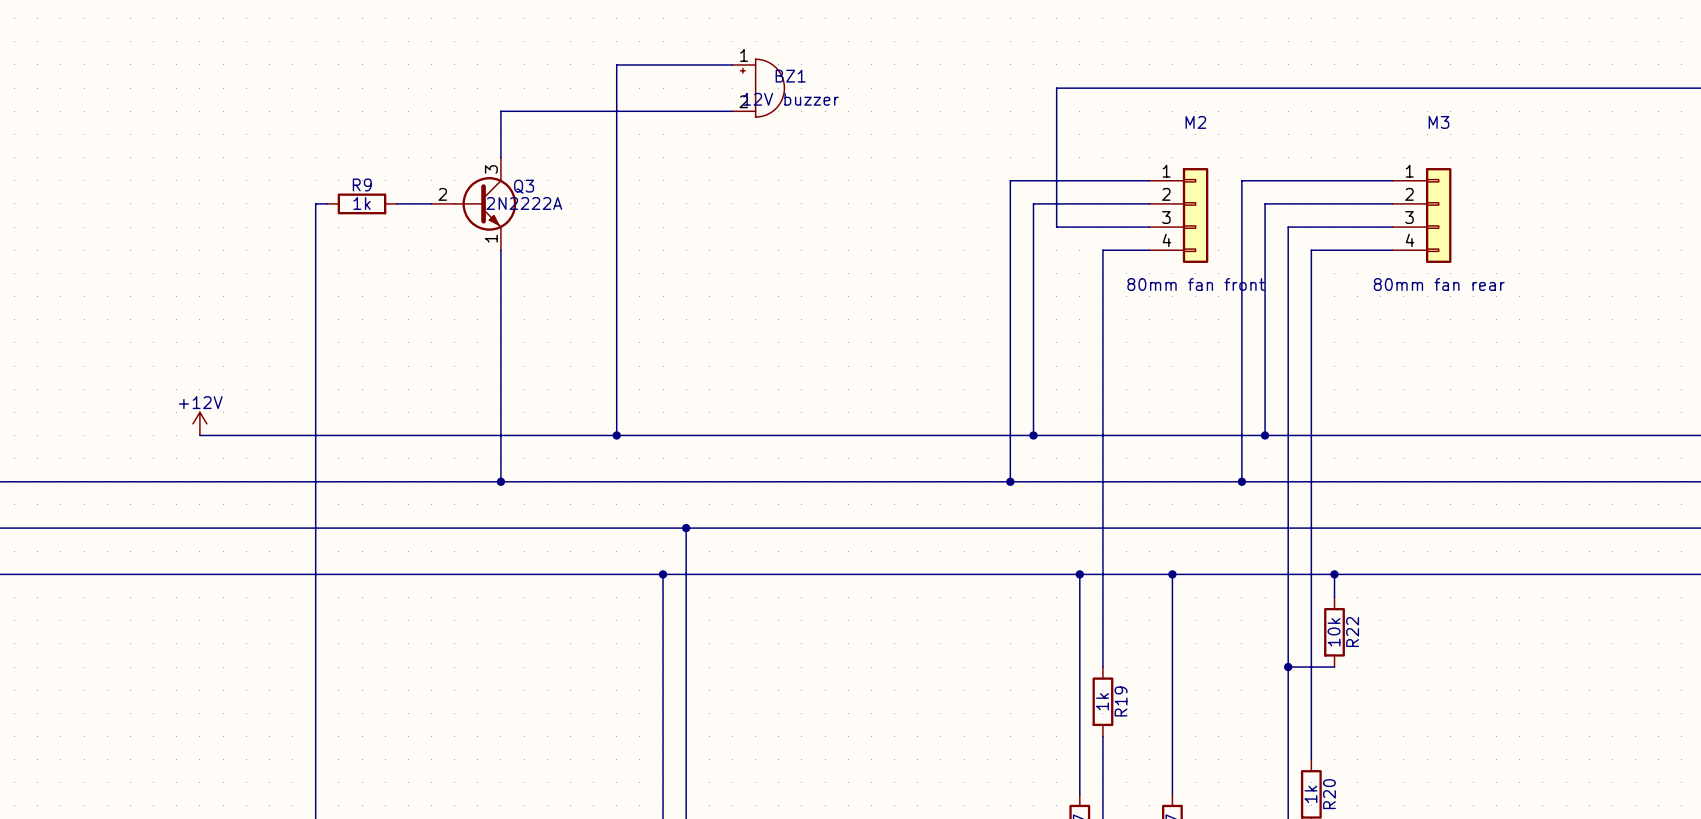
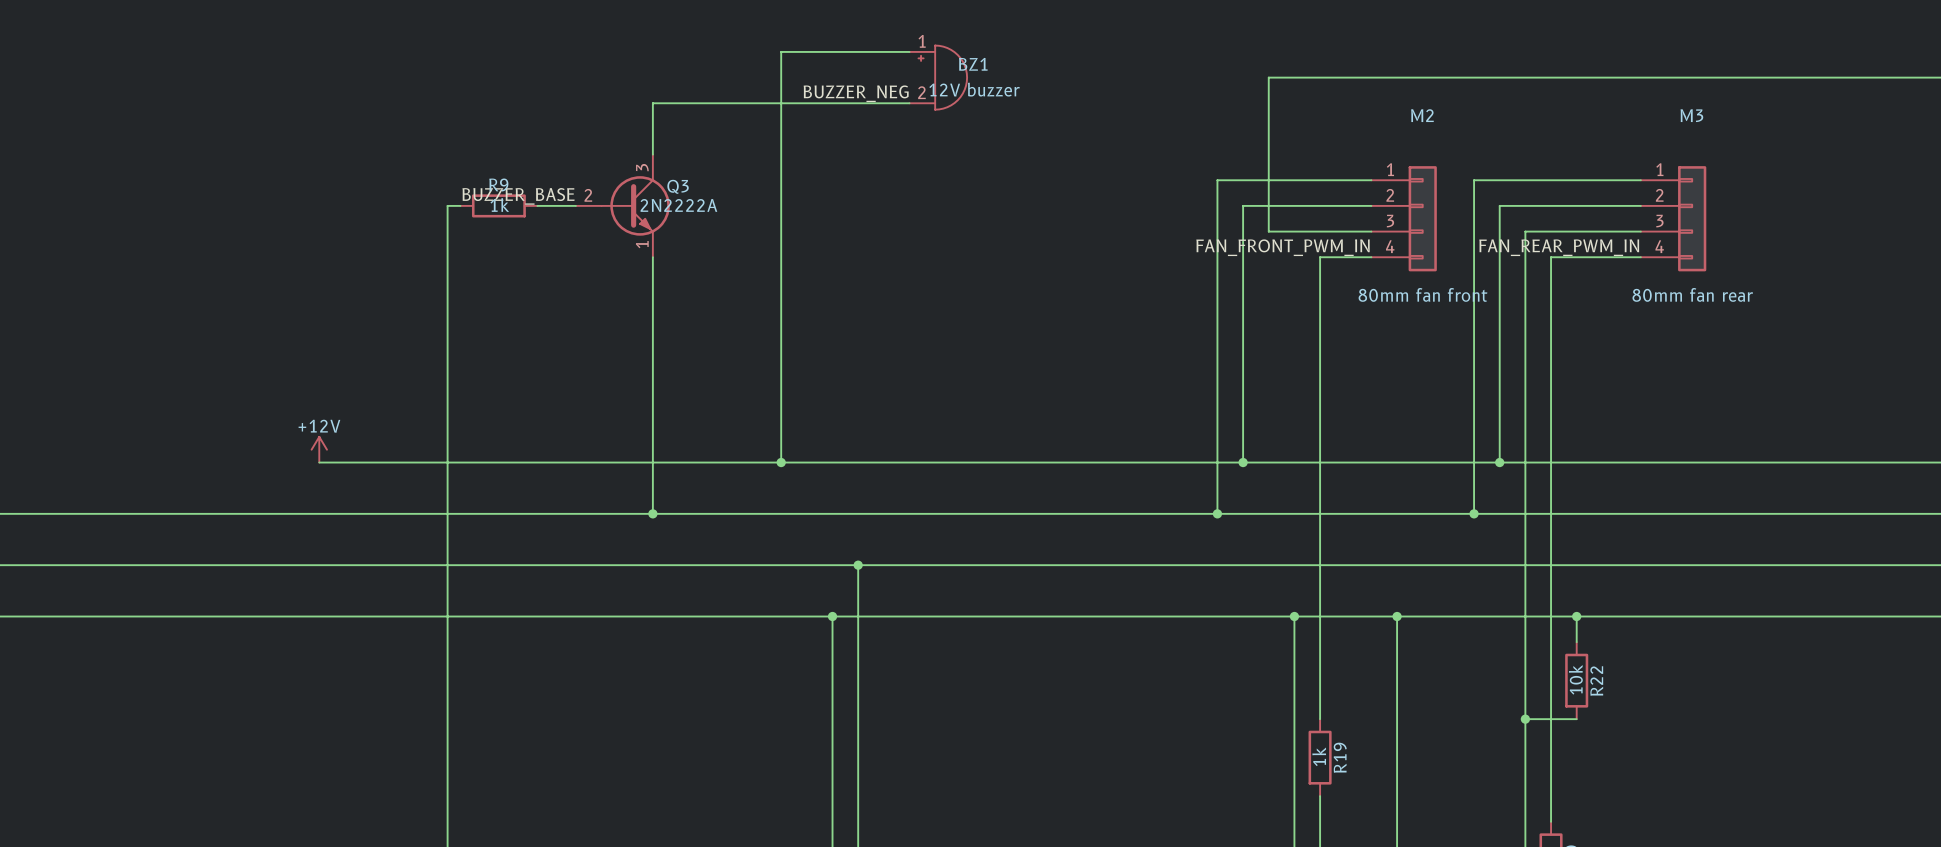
label: none -> BUZZER_NEG (856, 93)
label: none -> BUZZER_BASE (518, 196)
label: none -> FAN_FRONT_PWM_IN (1283, 247)
label: none -> FAN_REAR_PWM_IN (1559, 247)

